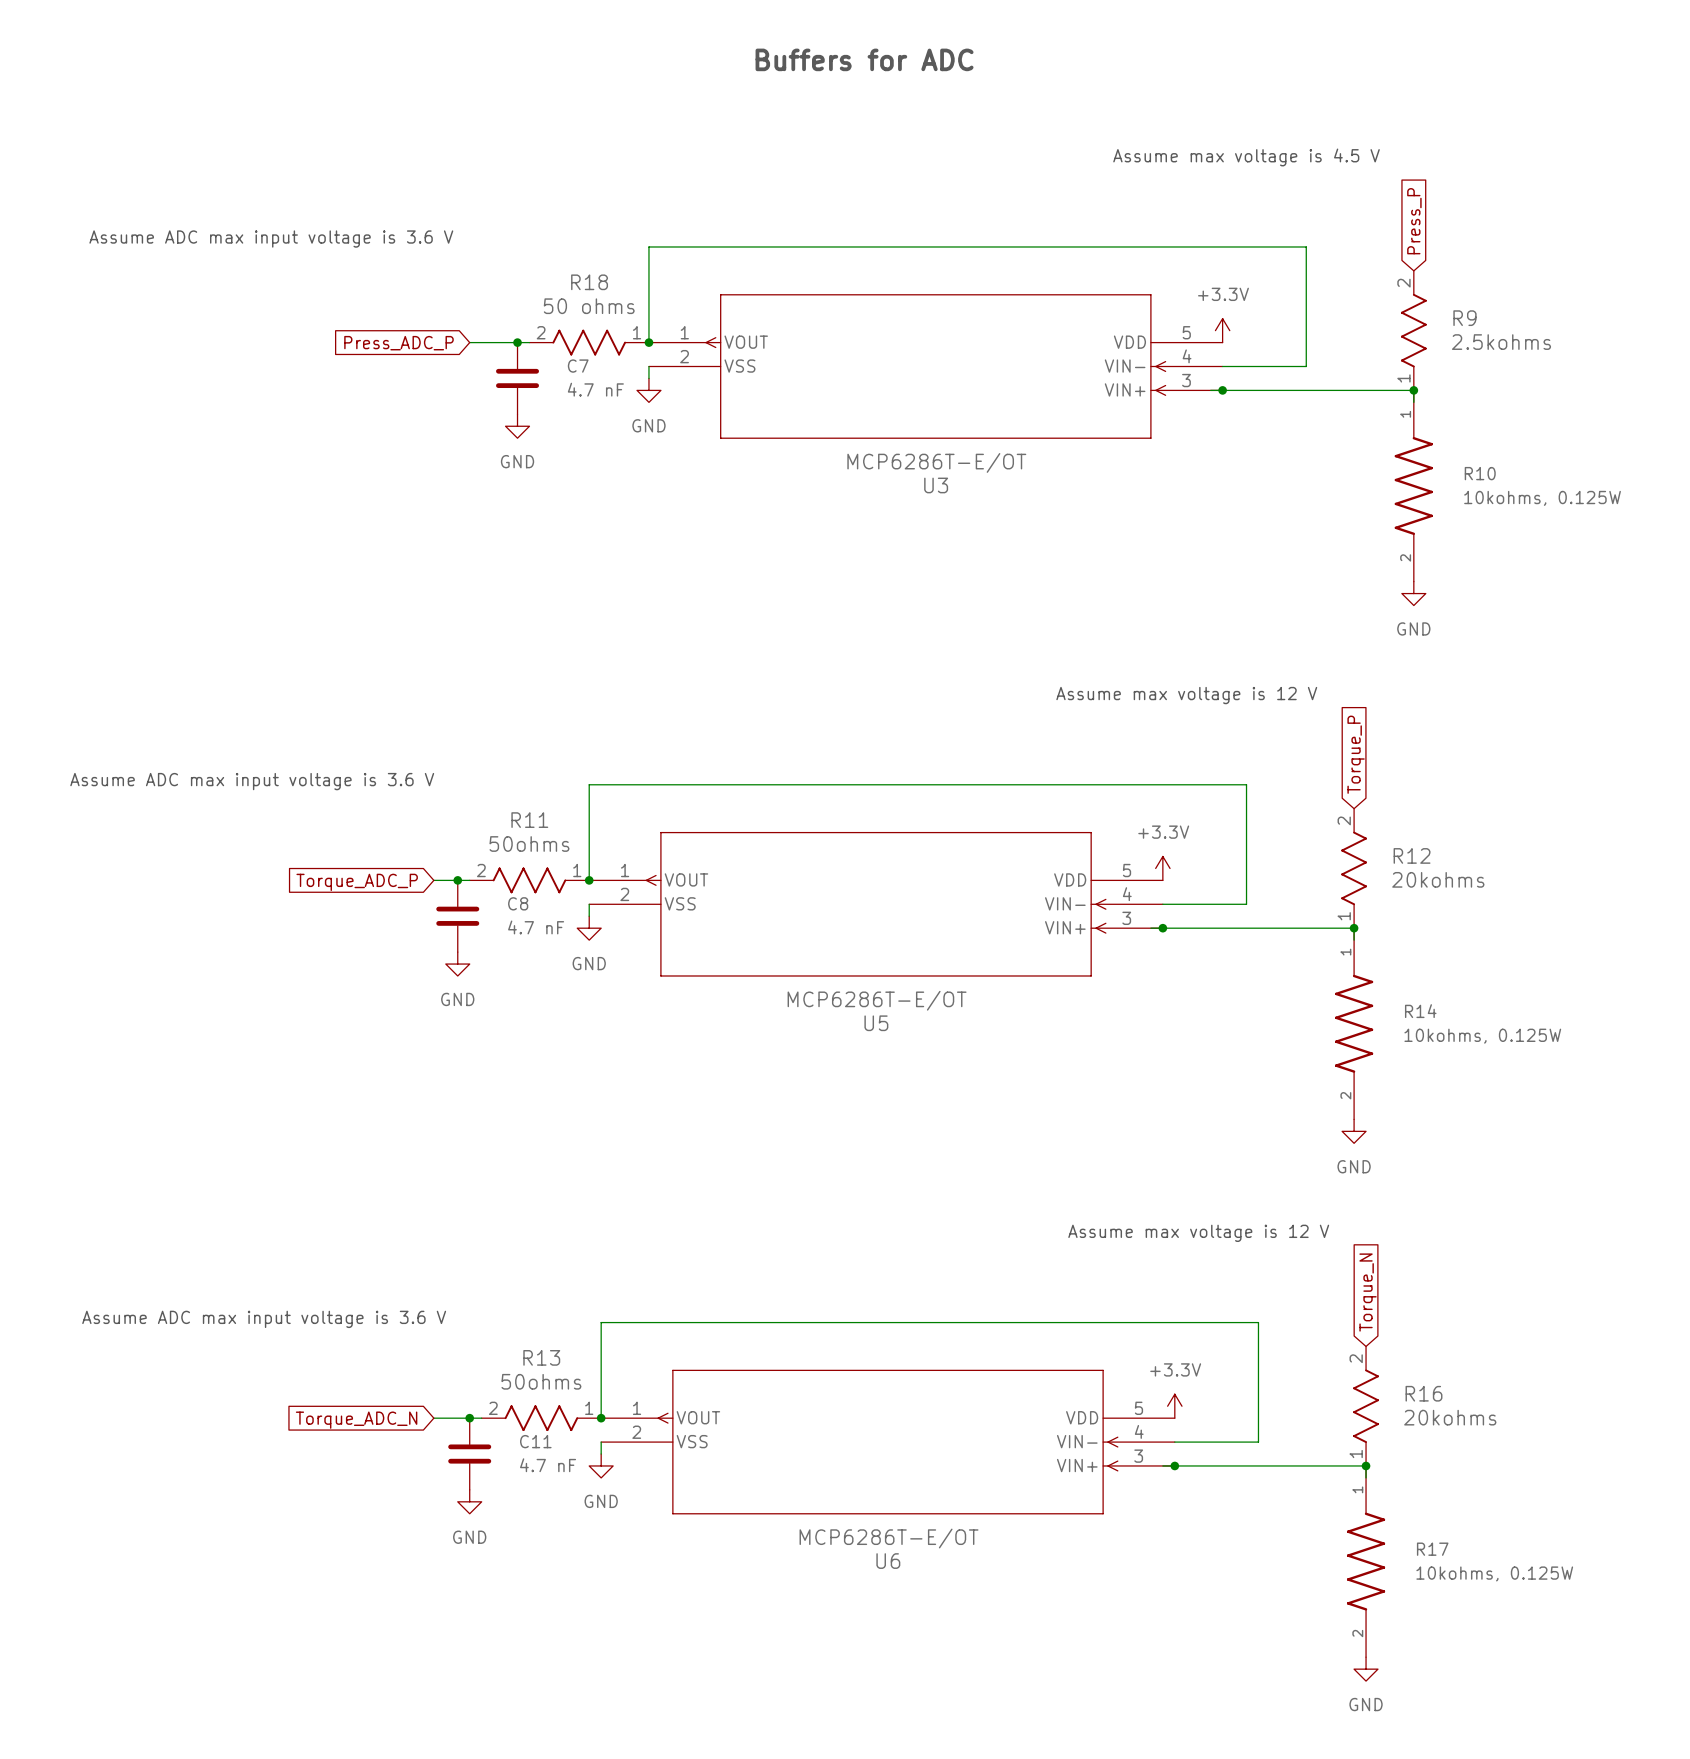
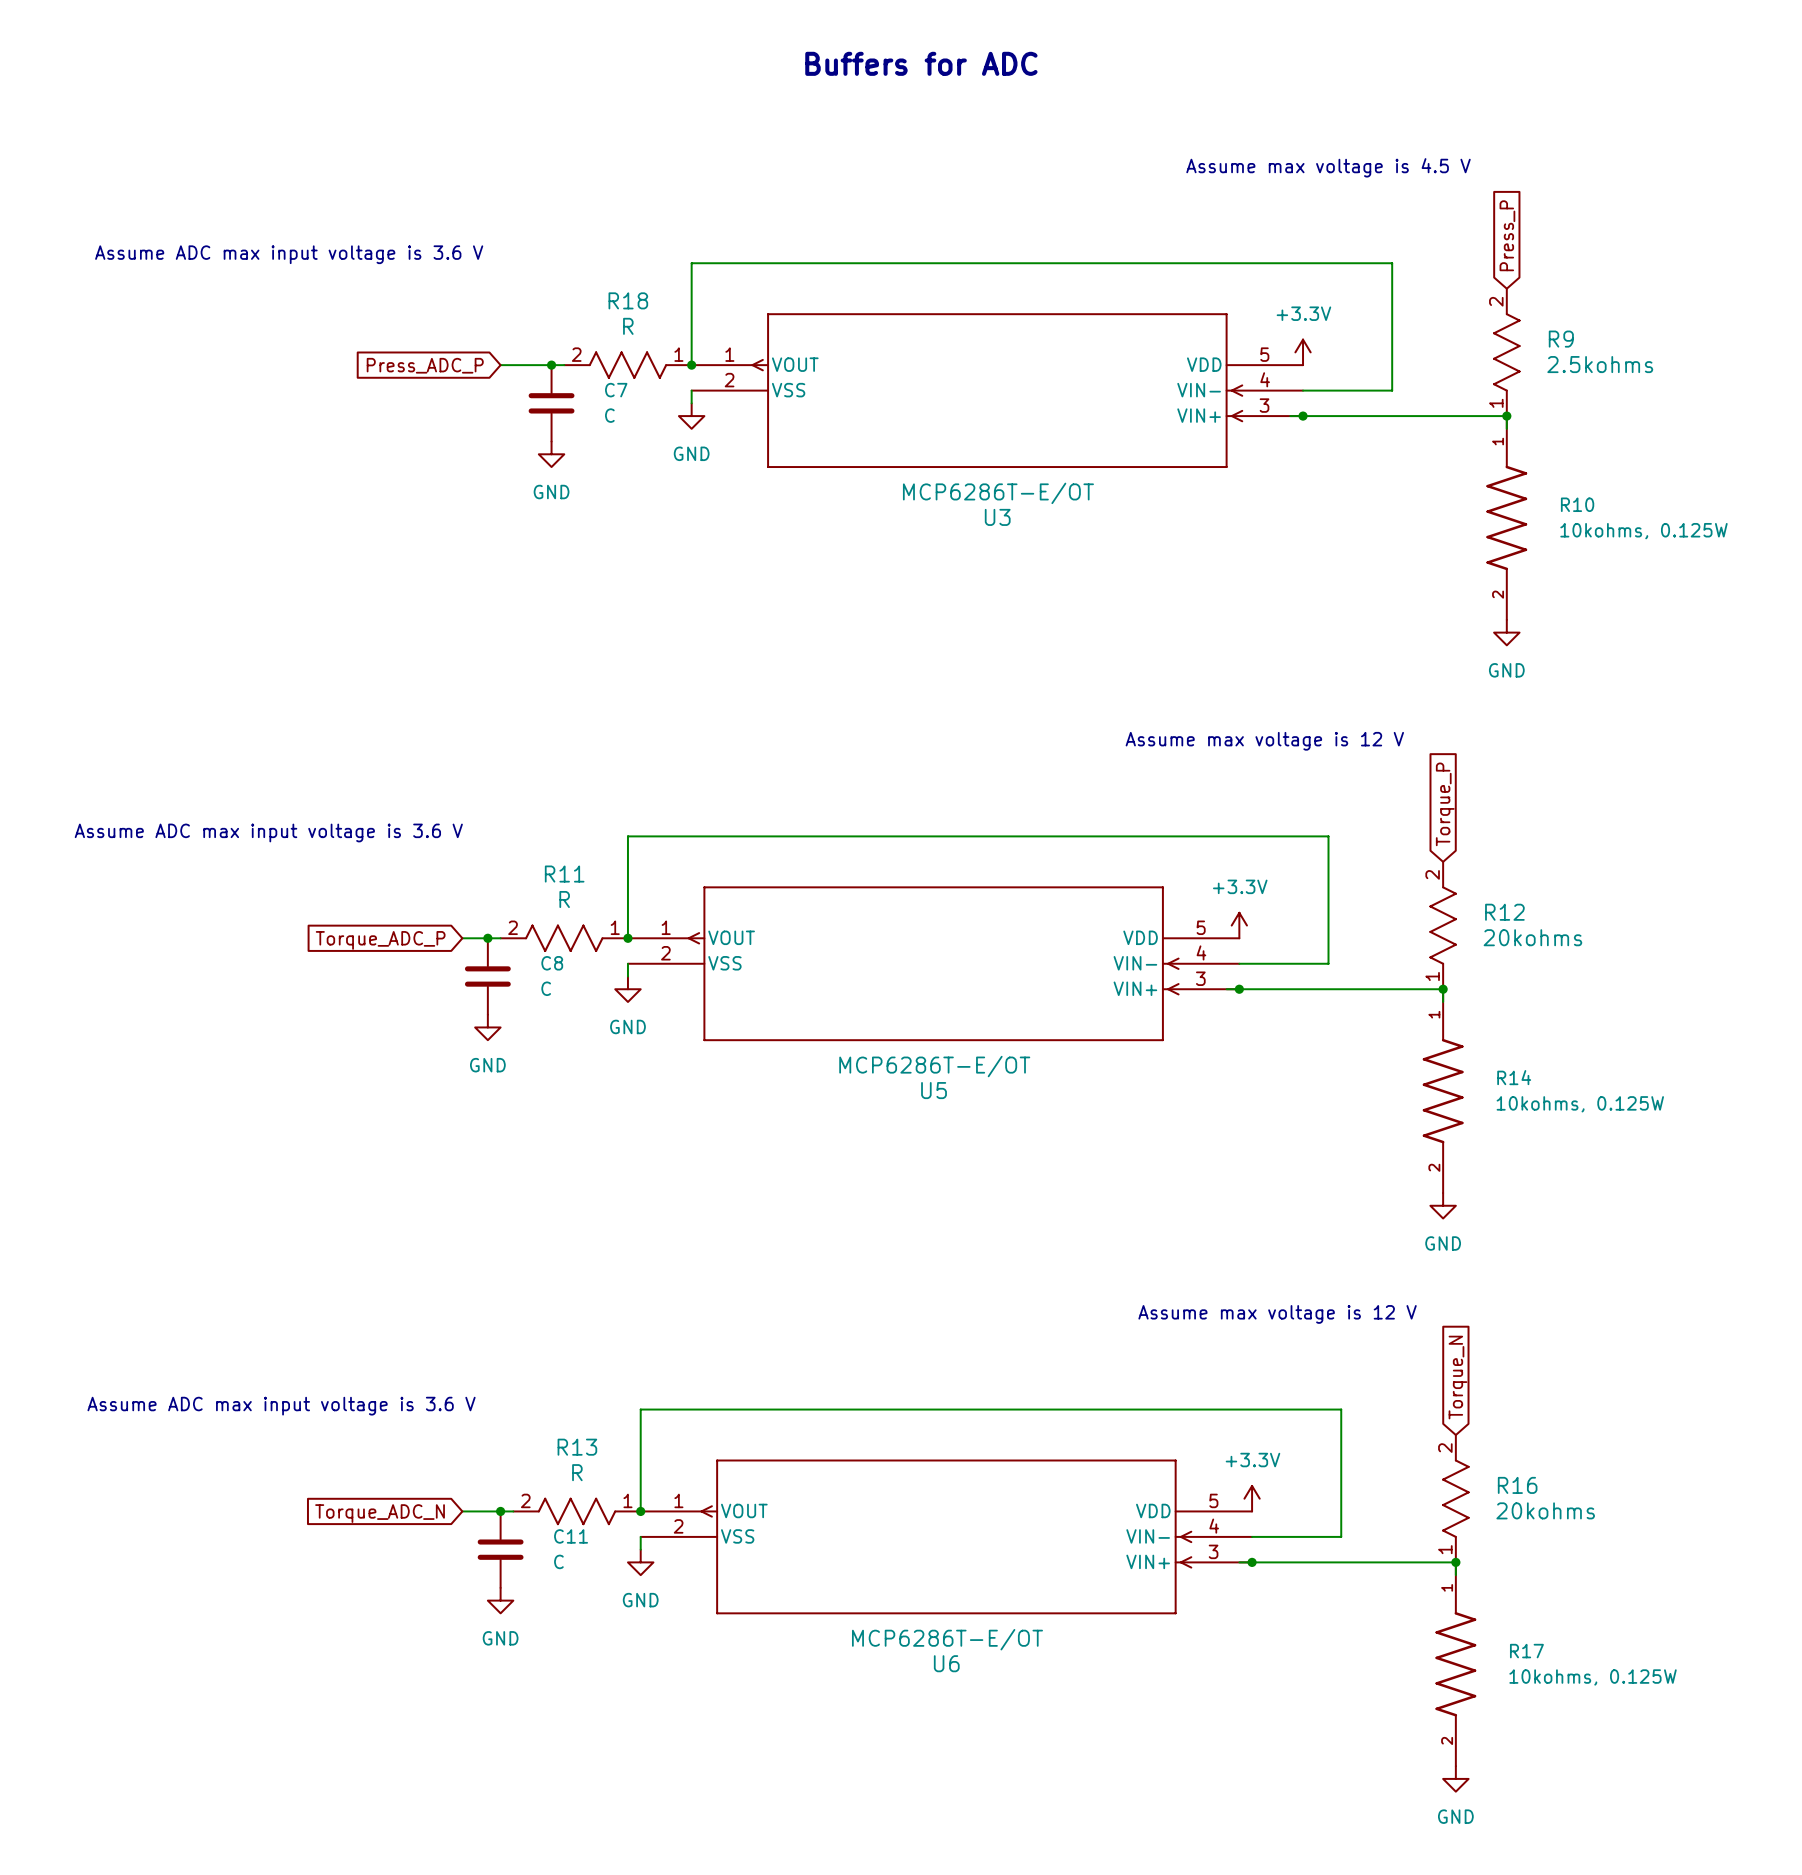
R18 value: 50 ohms (589, 306) -> R (628, 326)
C7 value: 4.7 nF (595, 389) -> C (609, 415)
R11 value: 50ohms (529, 844) -> R (564, 899)
C8 value: 4.7 nF (536, 927) -> C (546, 988)
R13 value: 50ohms (541, 1381) -> R (577, 1472)
C11 value: 4.7 nF (548, 1465) -> C (558, 1561)

